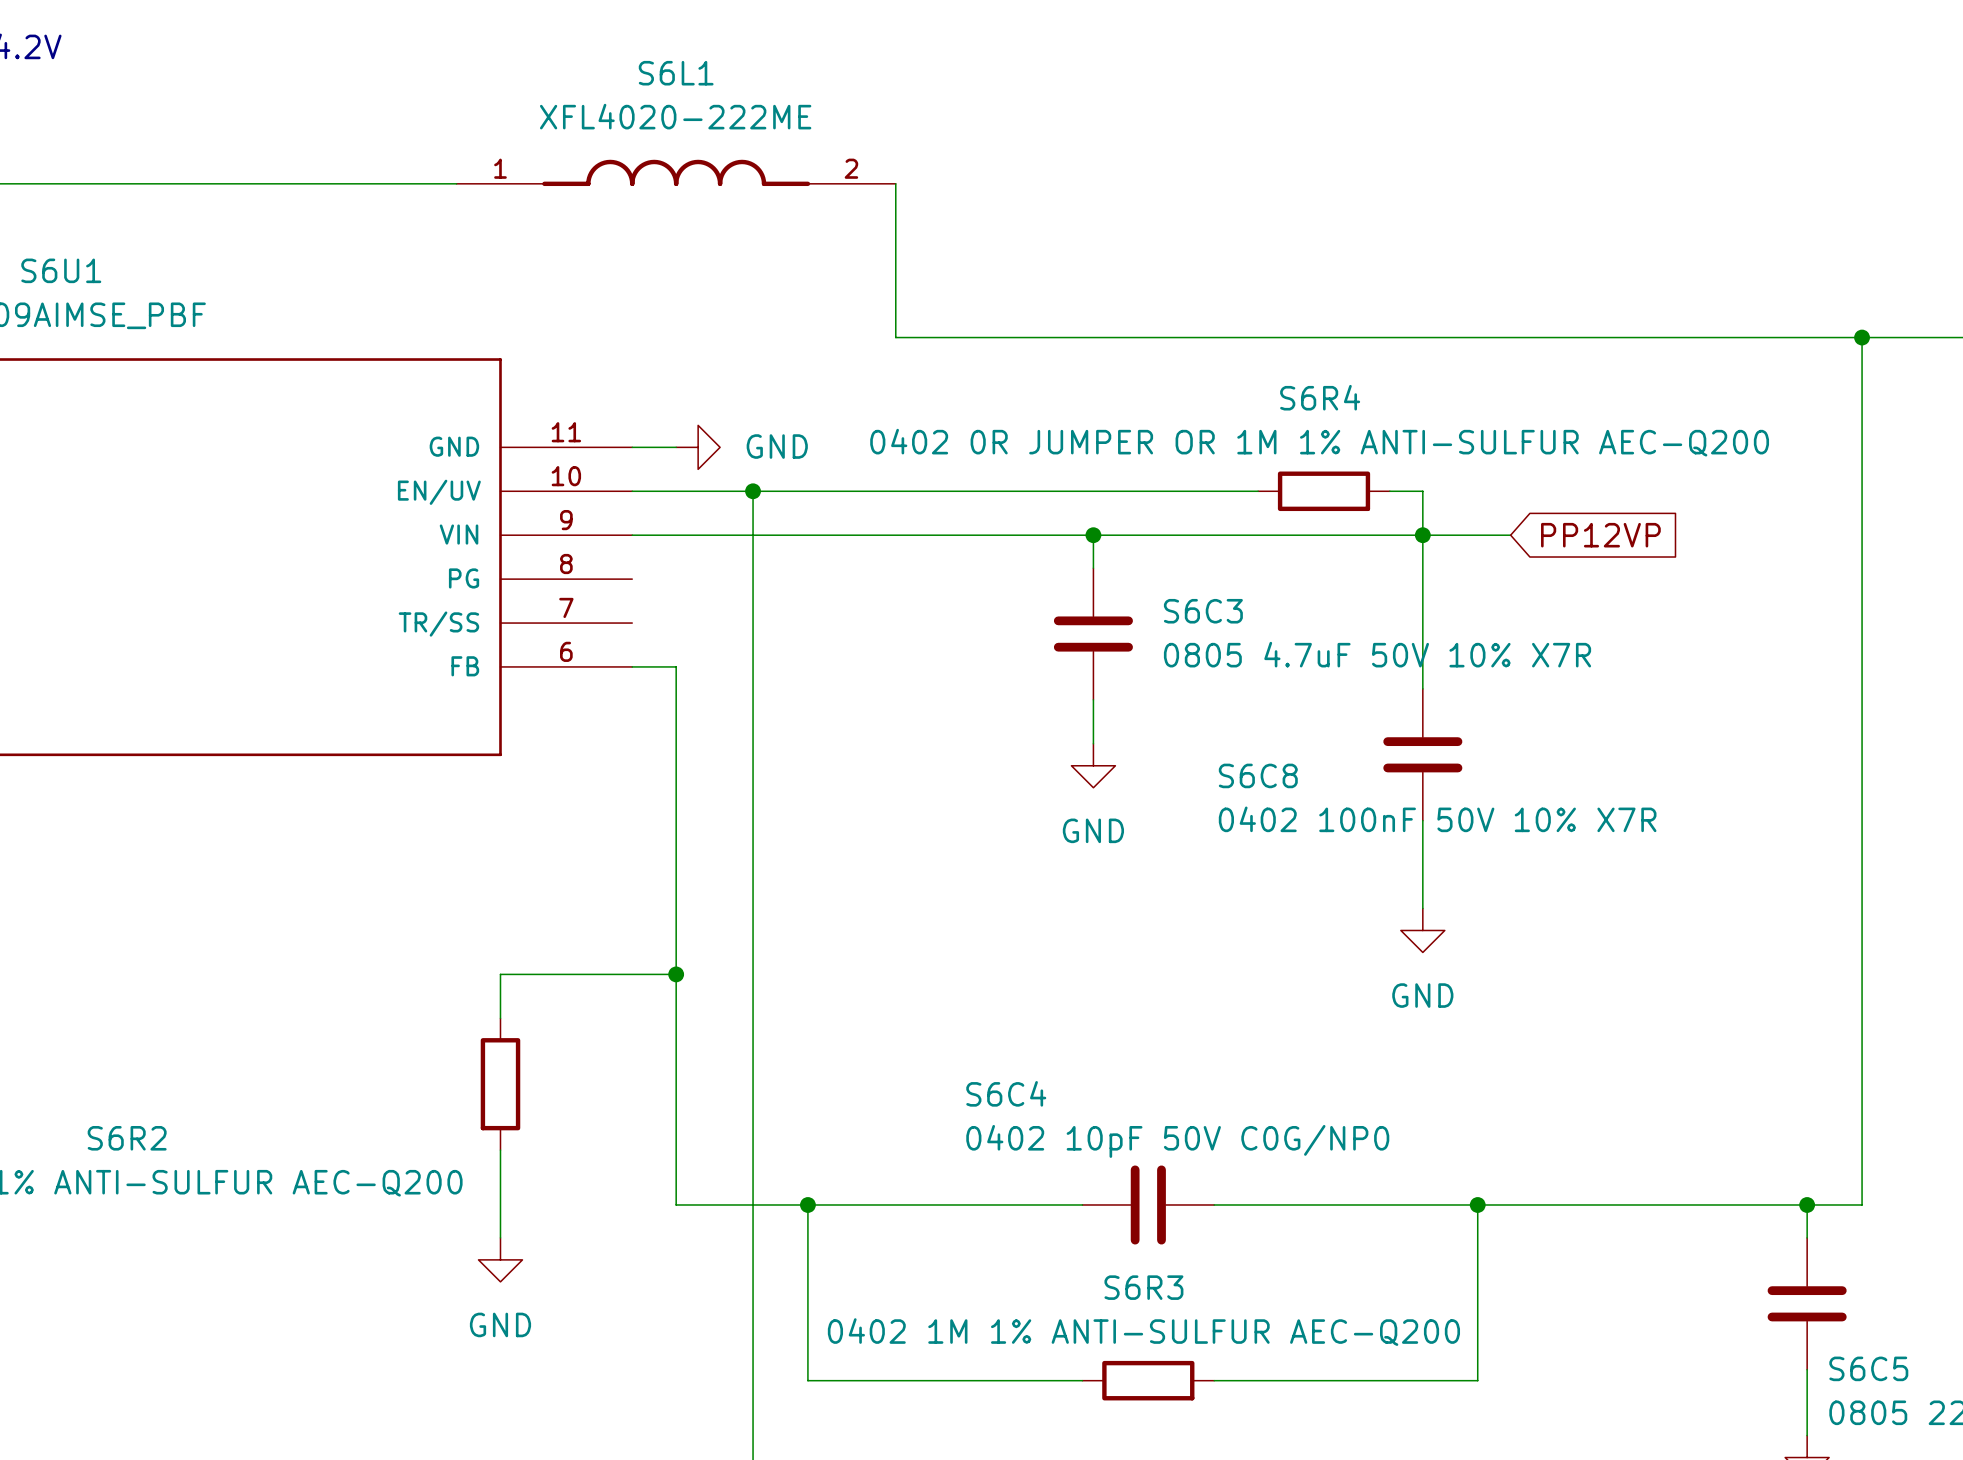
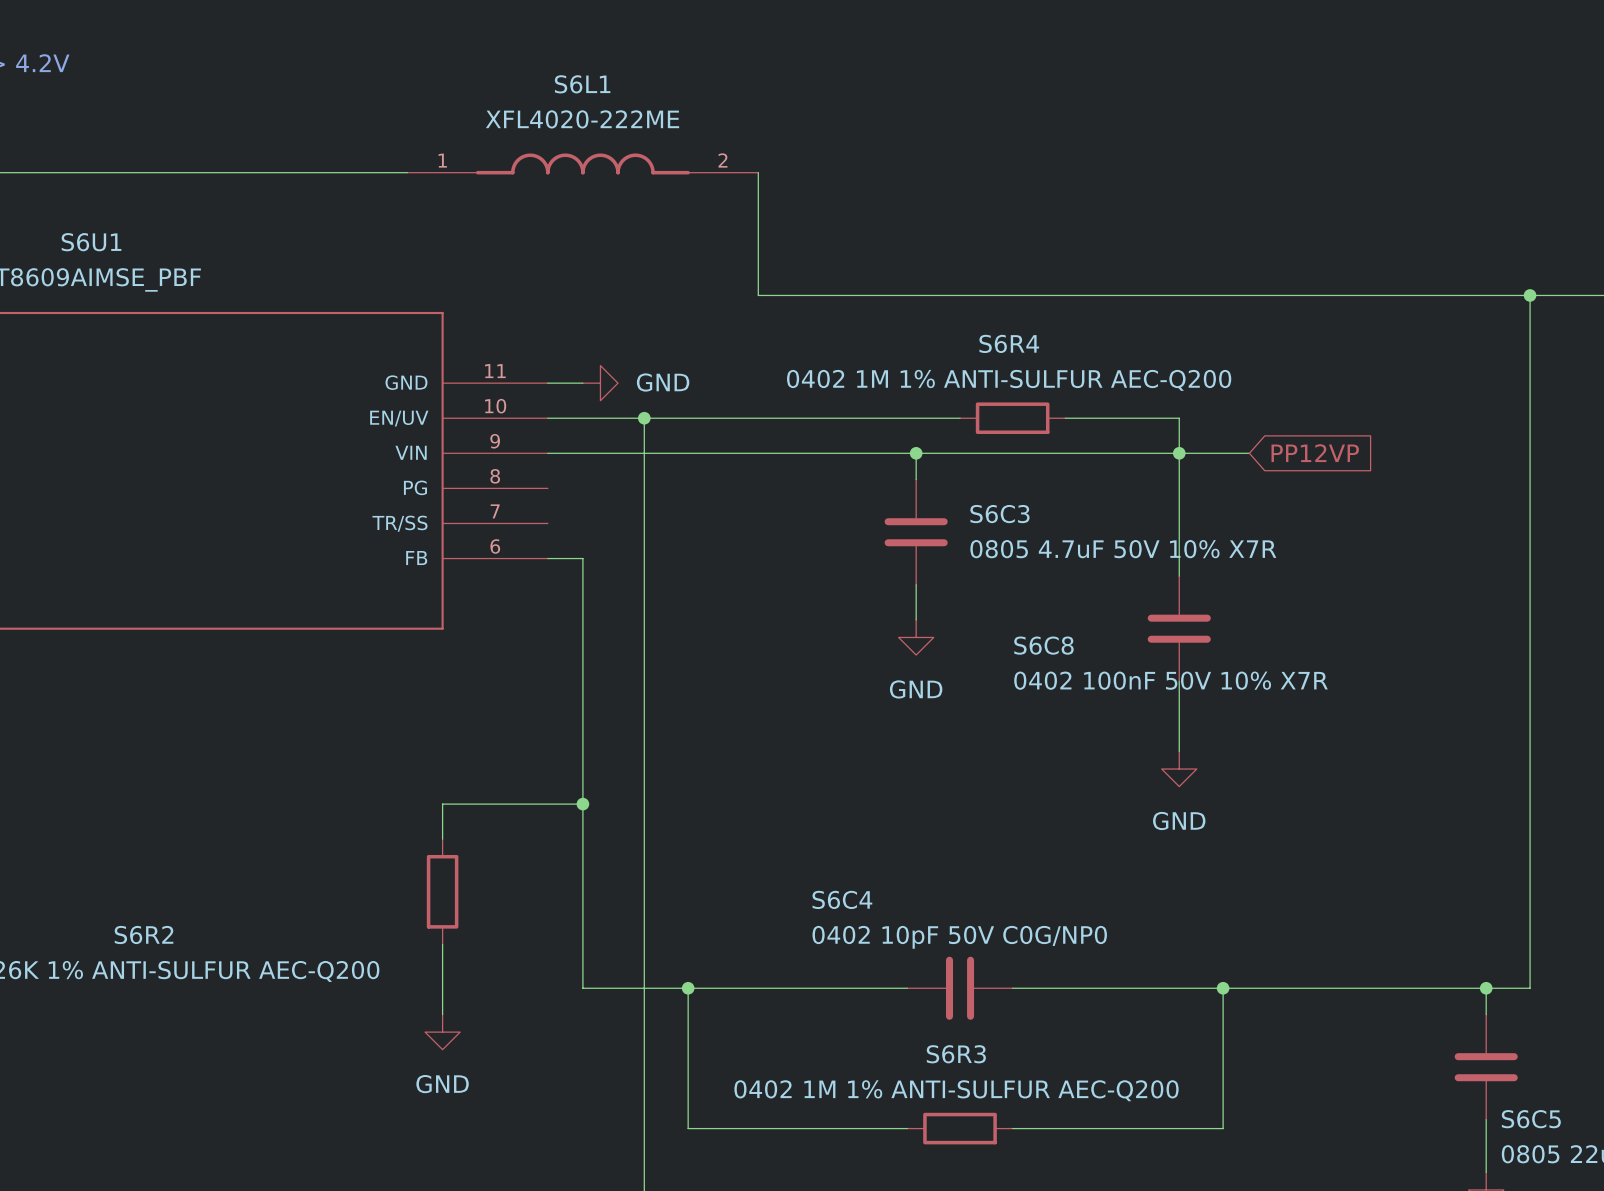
S6R4 value: 0402 0R JUMPER OR 1M 1% ANTI-SULFUR AEC-Q200 (1319, 442) -> 0402 1M 1% ANTI-SULFUR AEC-Q200 (1009, 380)
wire: (1148, 491) (1258, 491) -> (1065, 418) (1152, 418)
S6R4 position: (1324, 491) -> (1012, 418)

